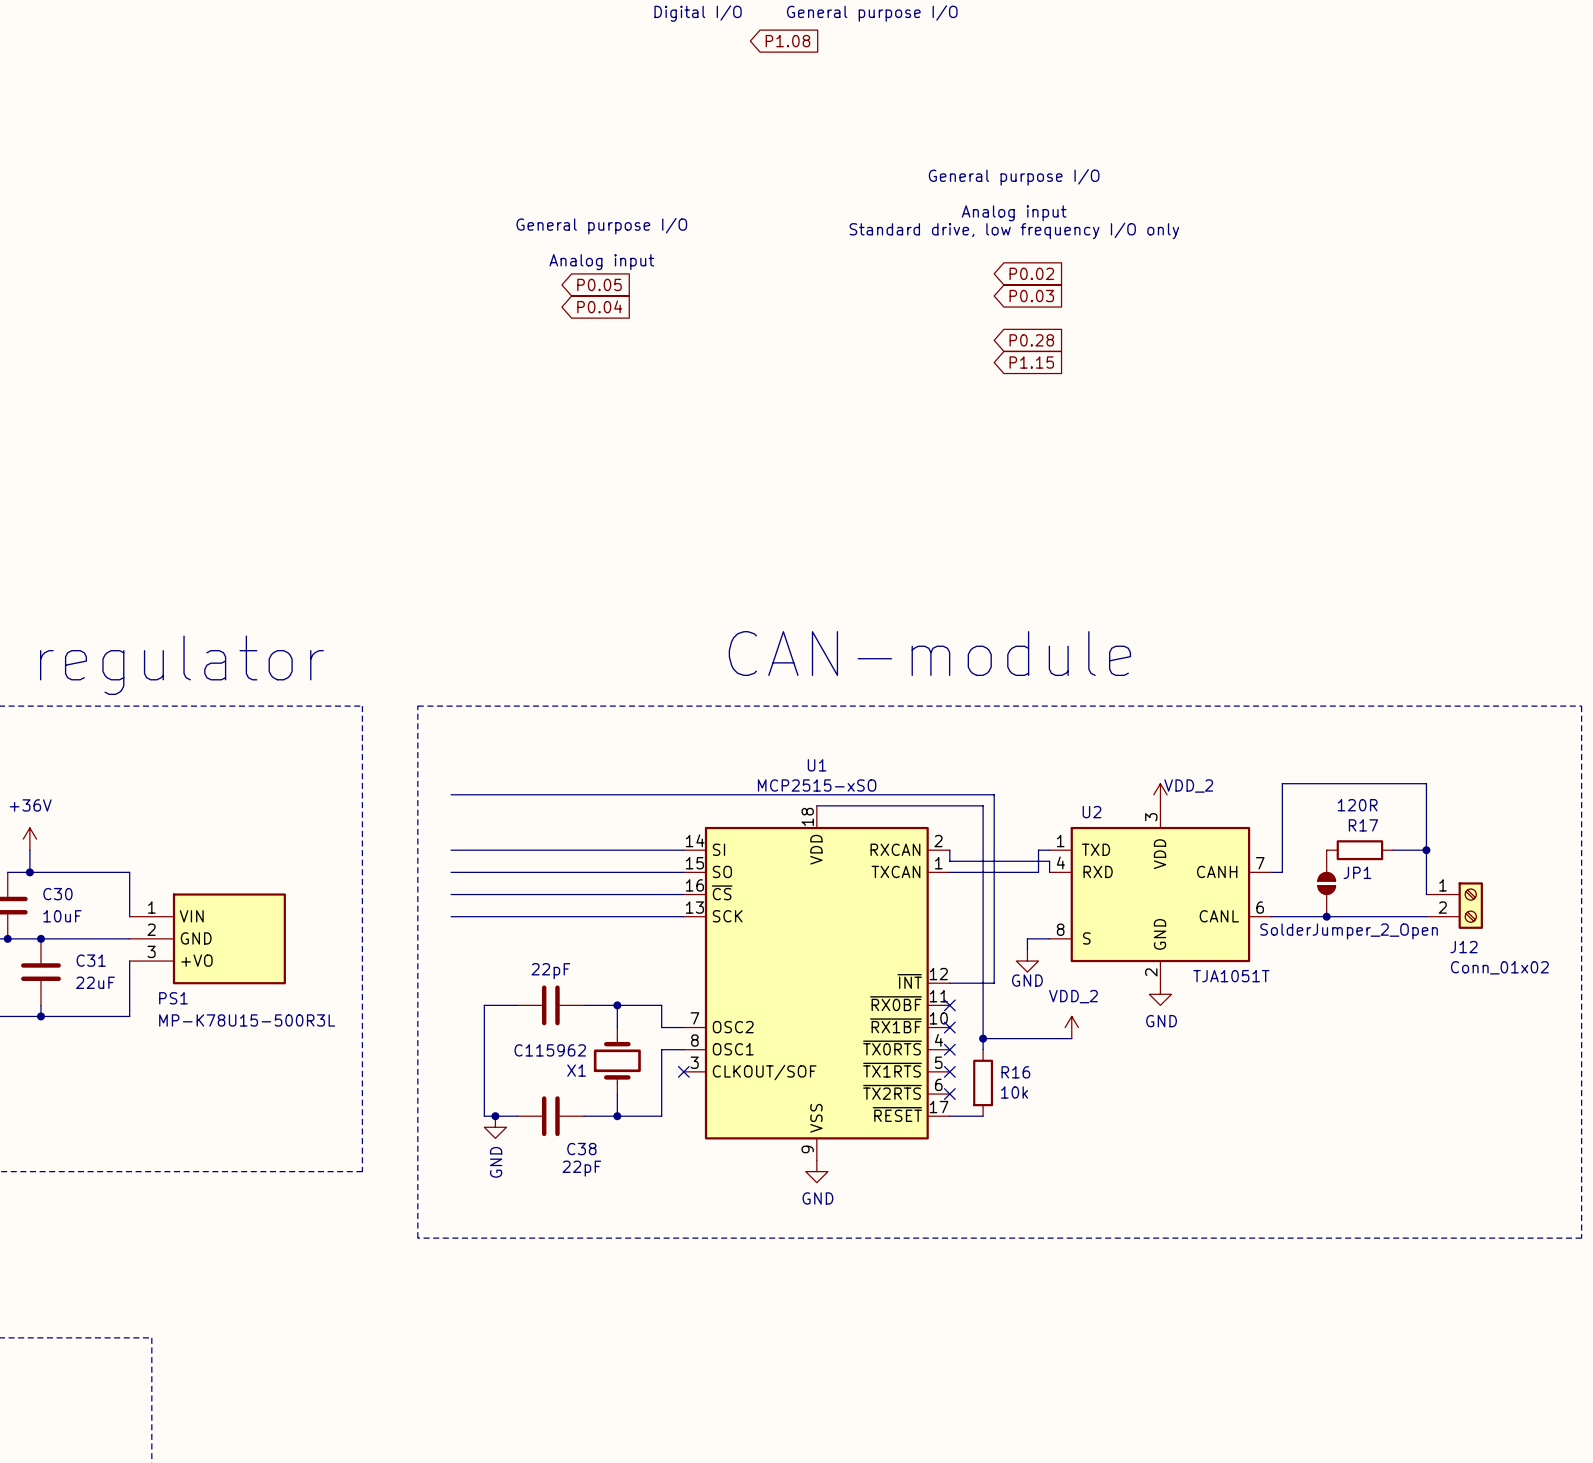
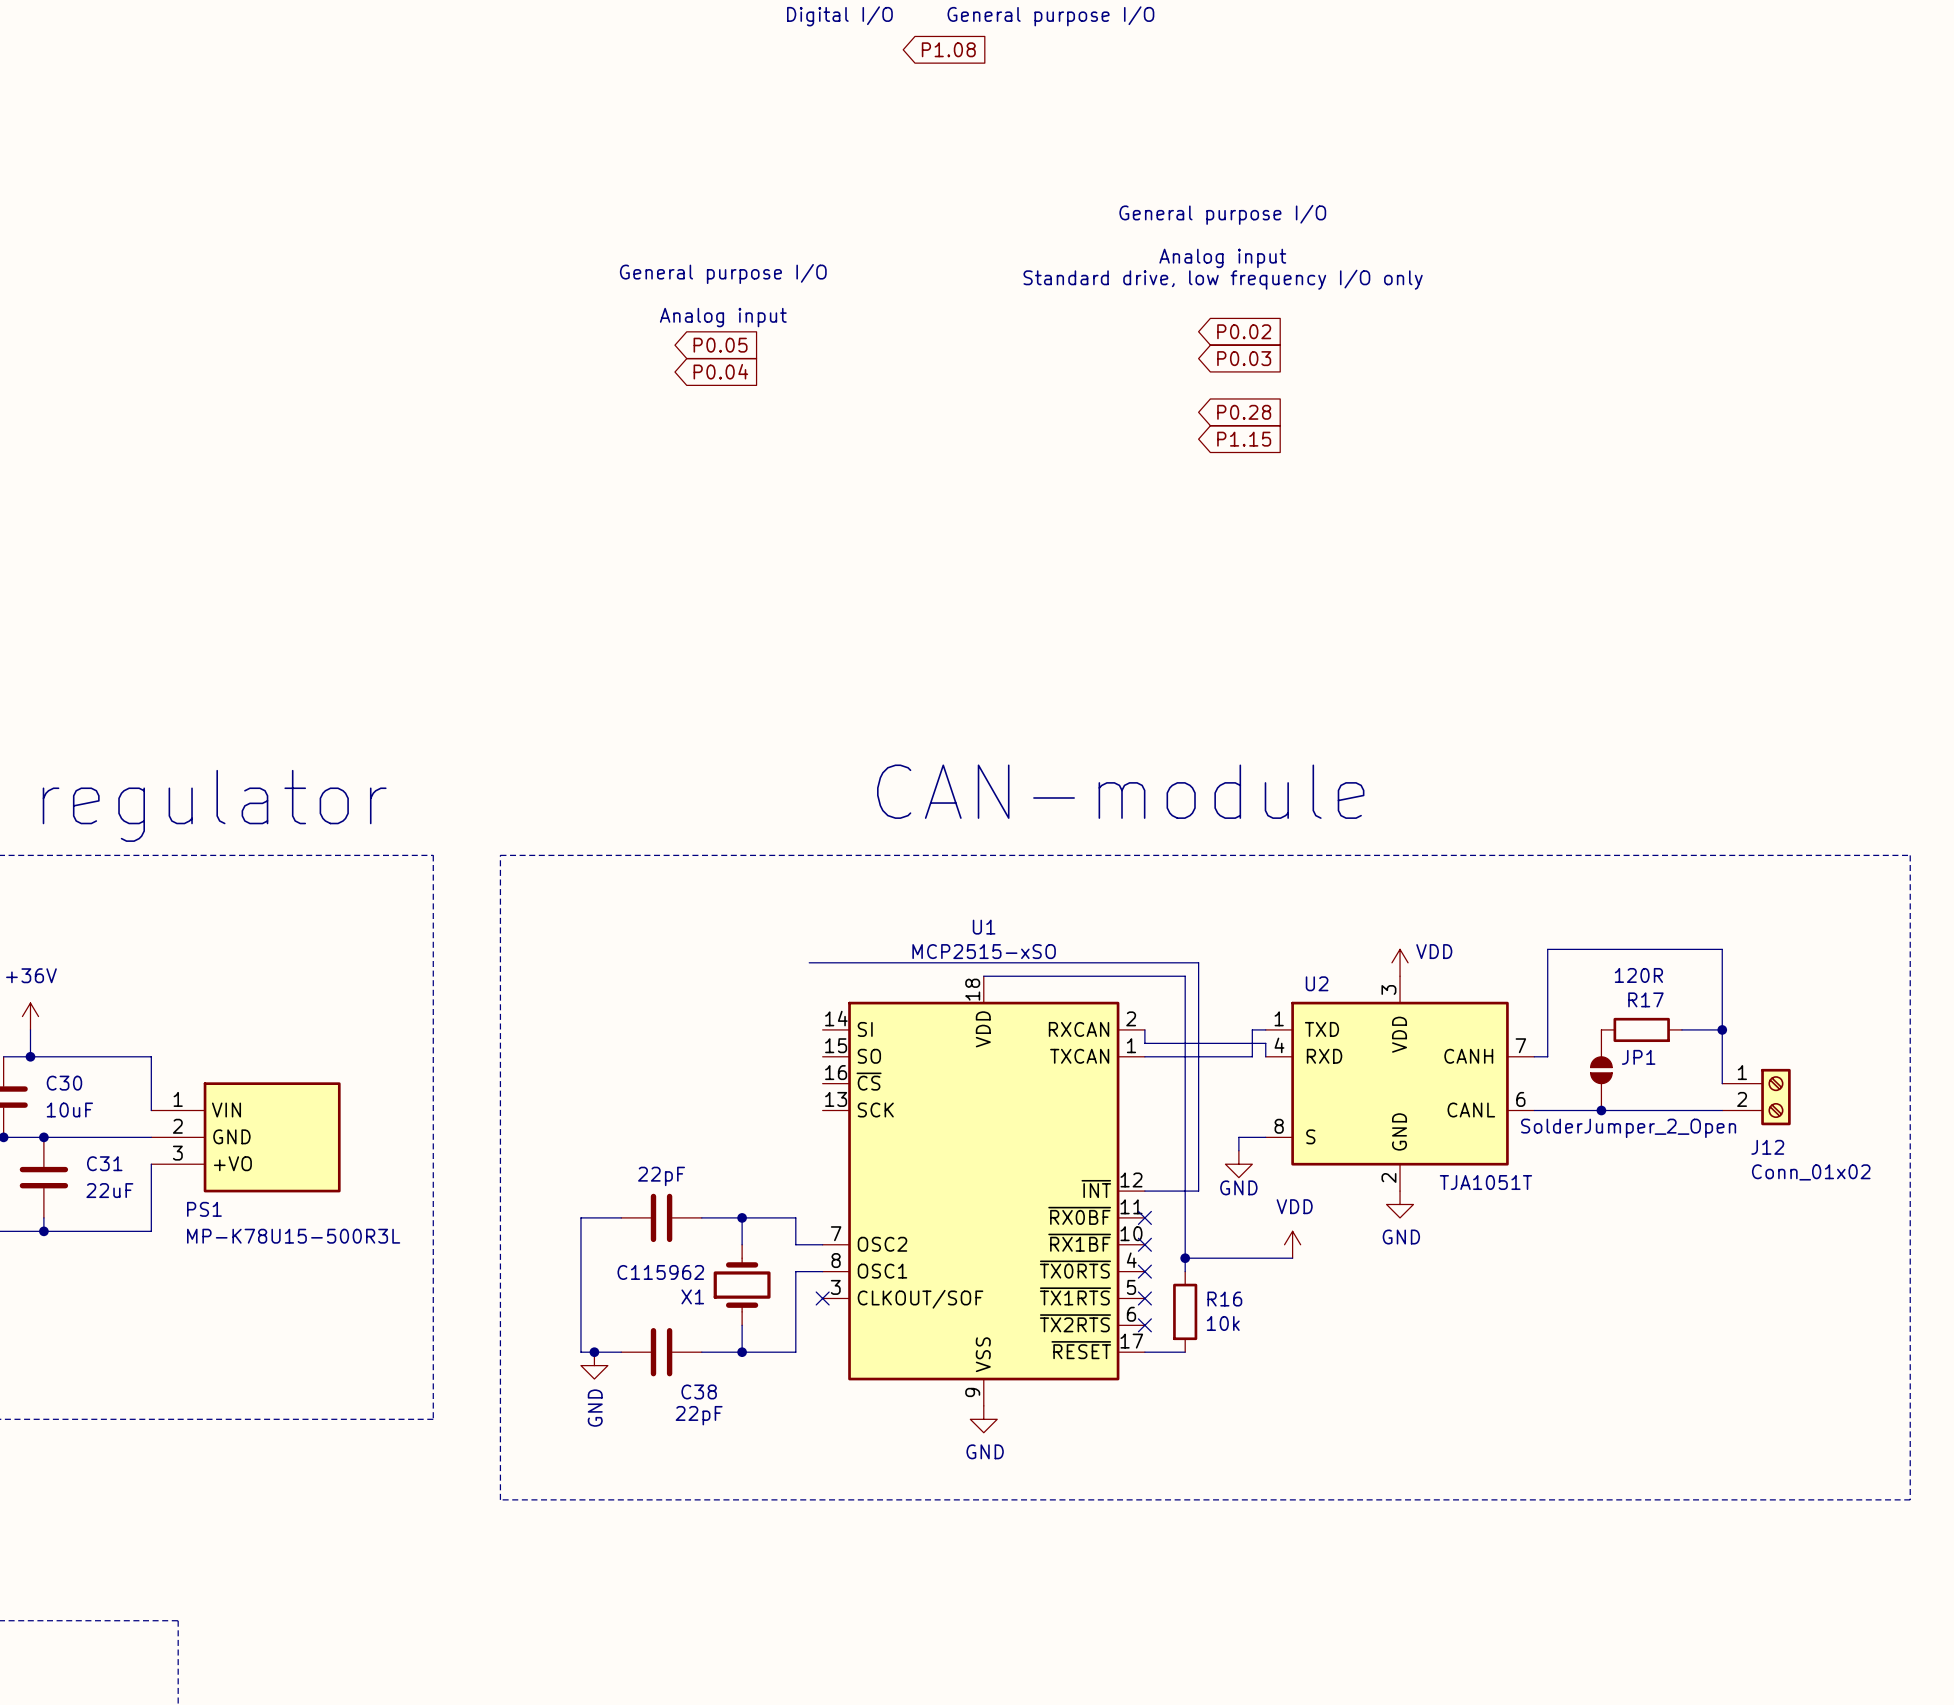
wire: (451, 794) (672, 794) -> none
power symbol: VDD_2 (1160, 794) -> VDD (1400, 962)
wire: (451, 850) (683, 850) -> none
wire: (451, 872) (683, 872) -> none
wire: (451, 894) (683, 894) -> none
wire: (451, 916) (683, 916) -> none
power symbol: VDD_2 (1071, 1027) -> VDD (1292, 1244)

